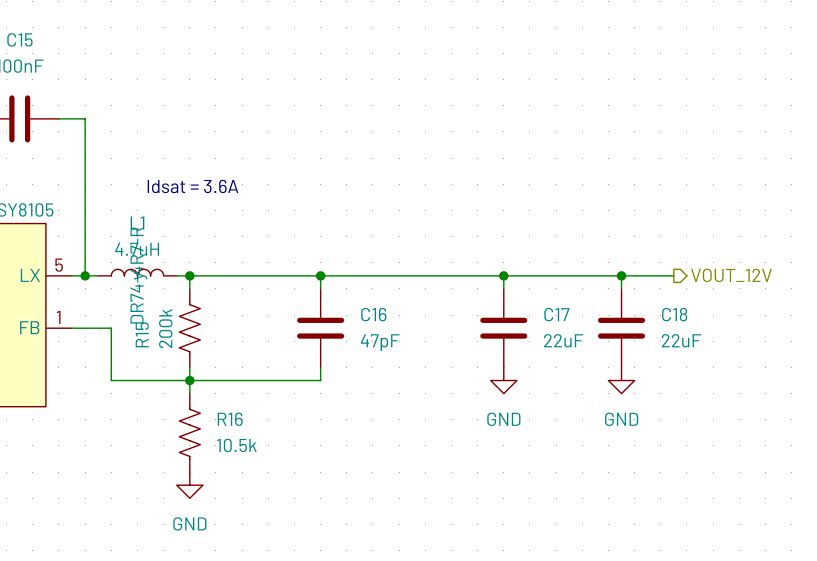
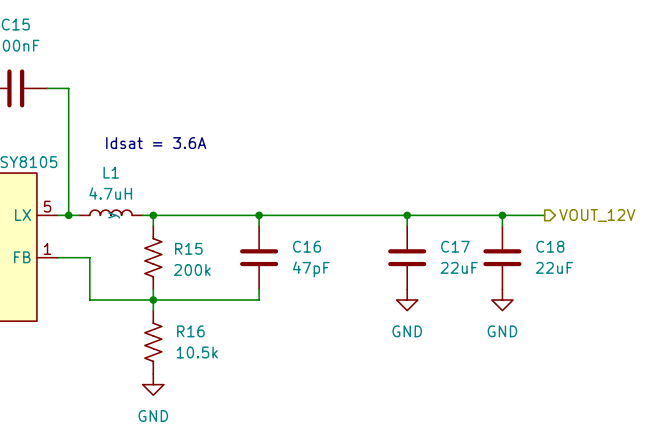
L1 text: DR74-4R7-R (136, 275) -> none
R15 value rotation: 0° (165, 328) -> 90° clockwise (192, 269)
R15 value position: 200k (165, 328) -> 200k (192, 269)
R15 name rotation: 0° (142, 334) -> 90° clockwise (188, 248)
R15 name position: R15 (142, 334) -> R15 (188, 248)

